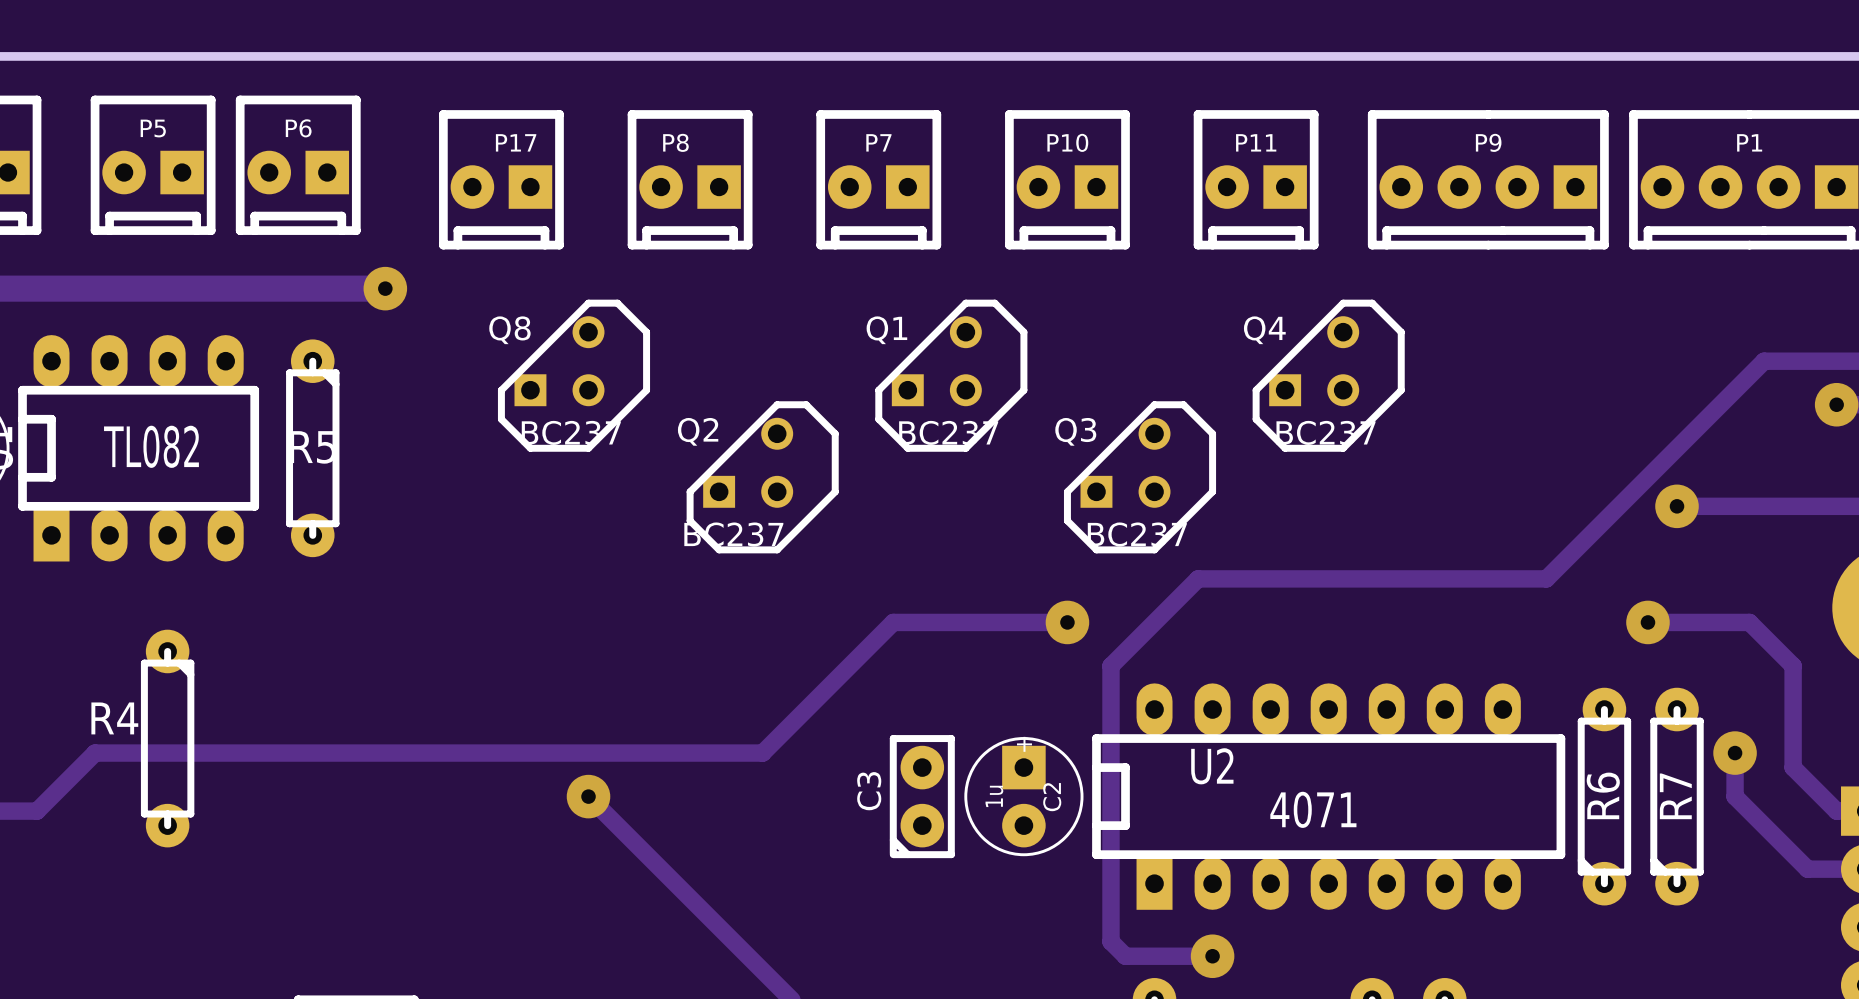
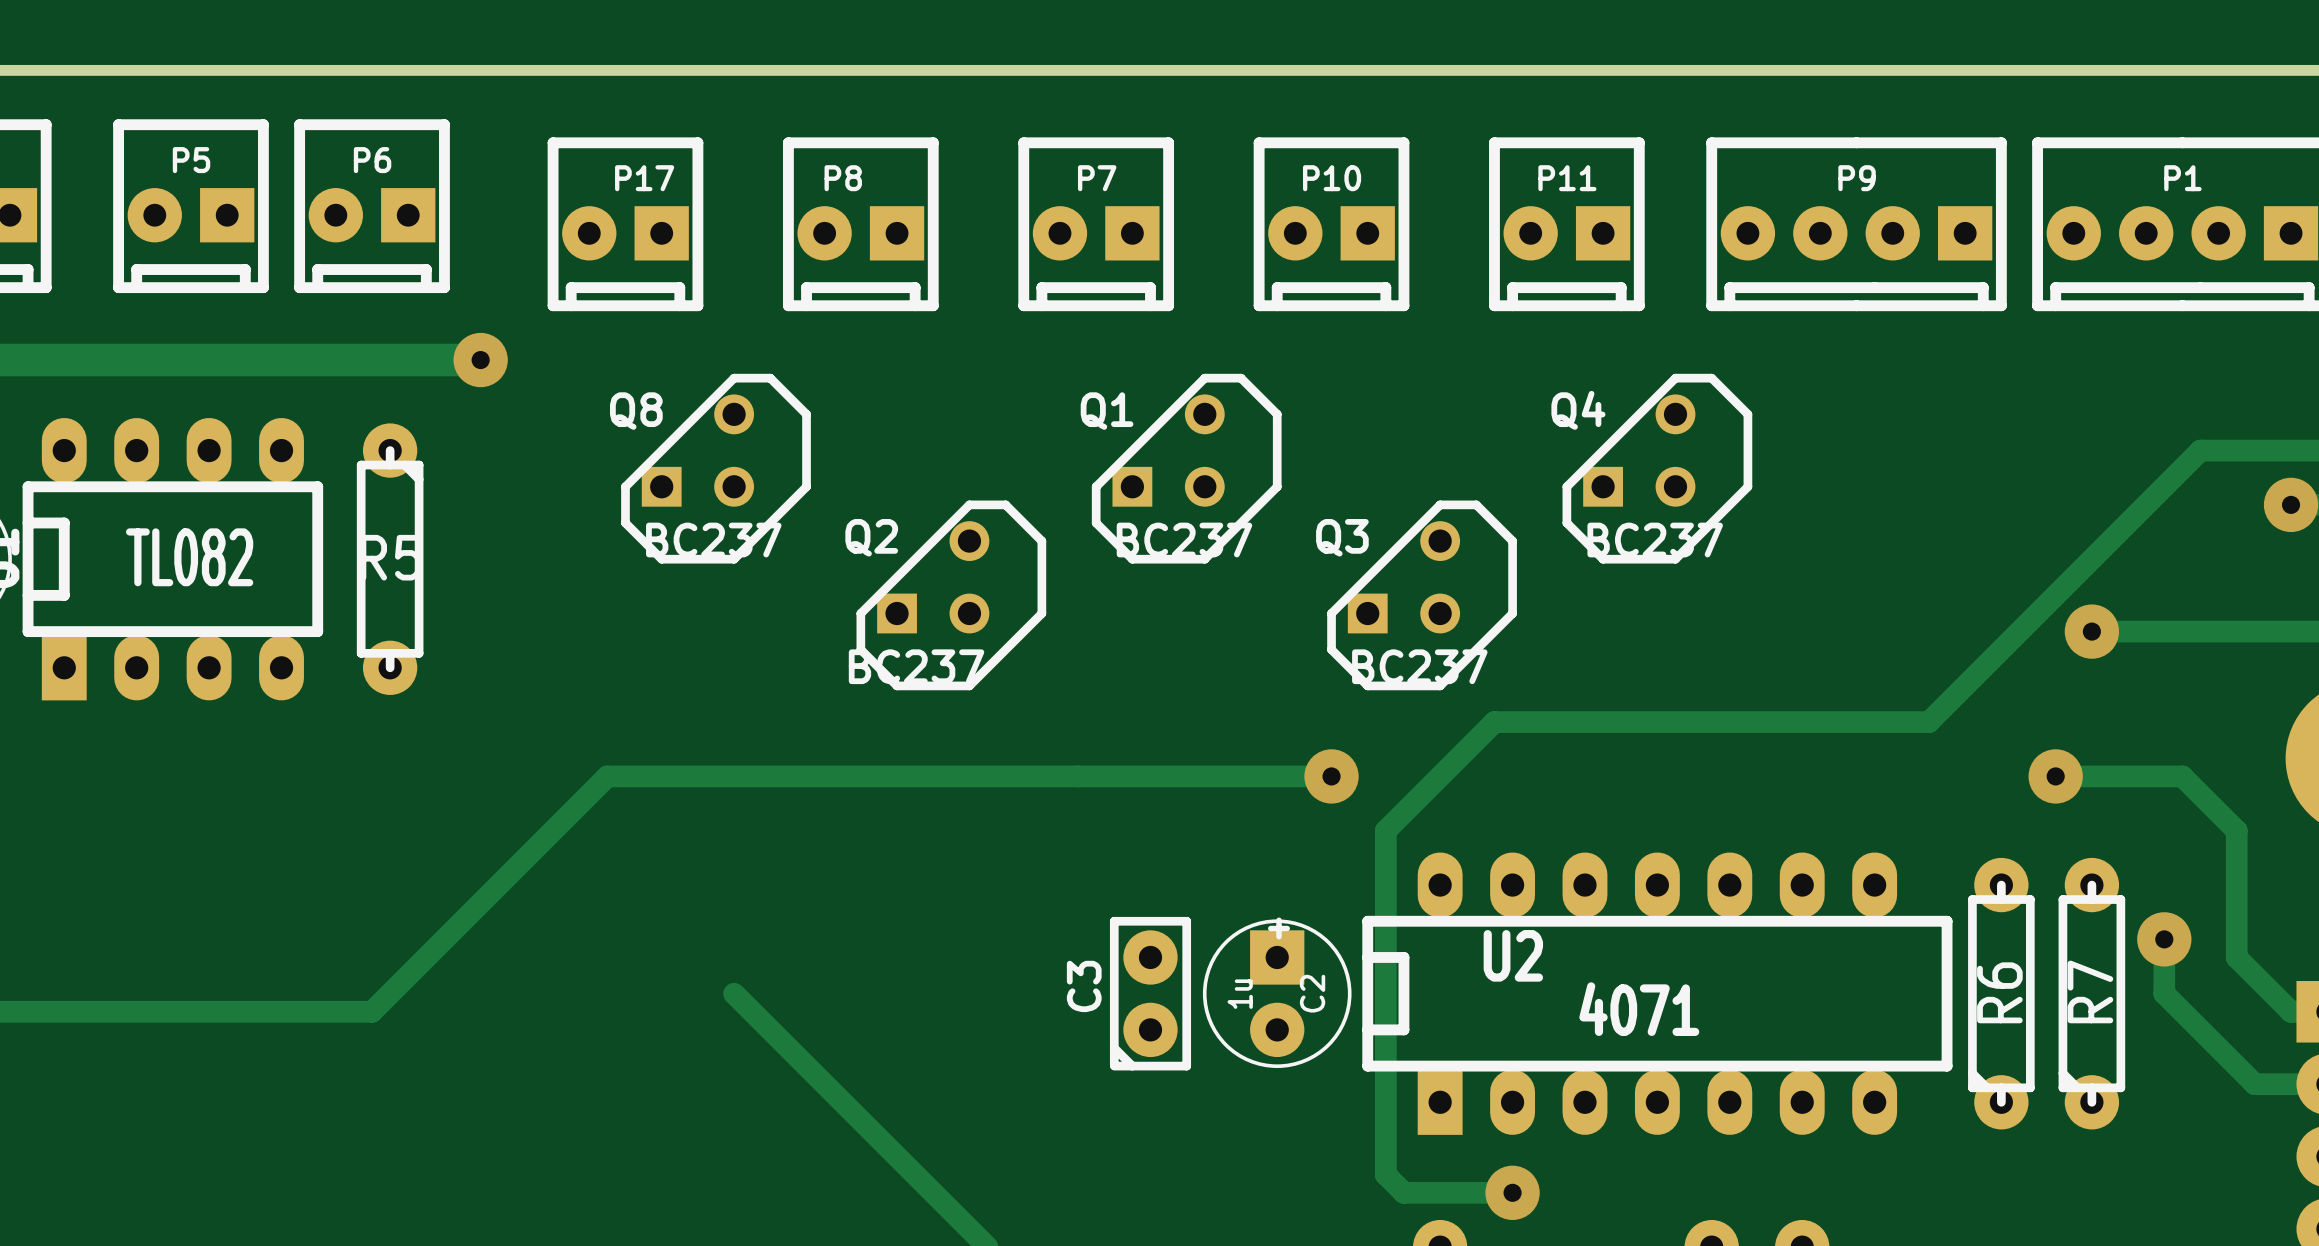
track: (893, 622) (762, 753) (95, 753) (37, 811) -> (1114, 776) (607, 776) (372, 1011) (46, 1011)
R4: (167, 738) -> none
via: (588, 796) -> none

